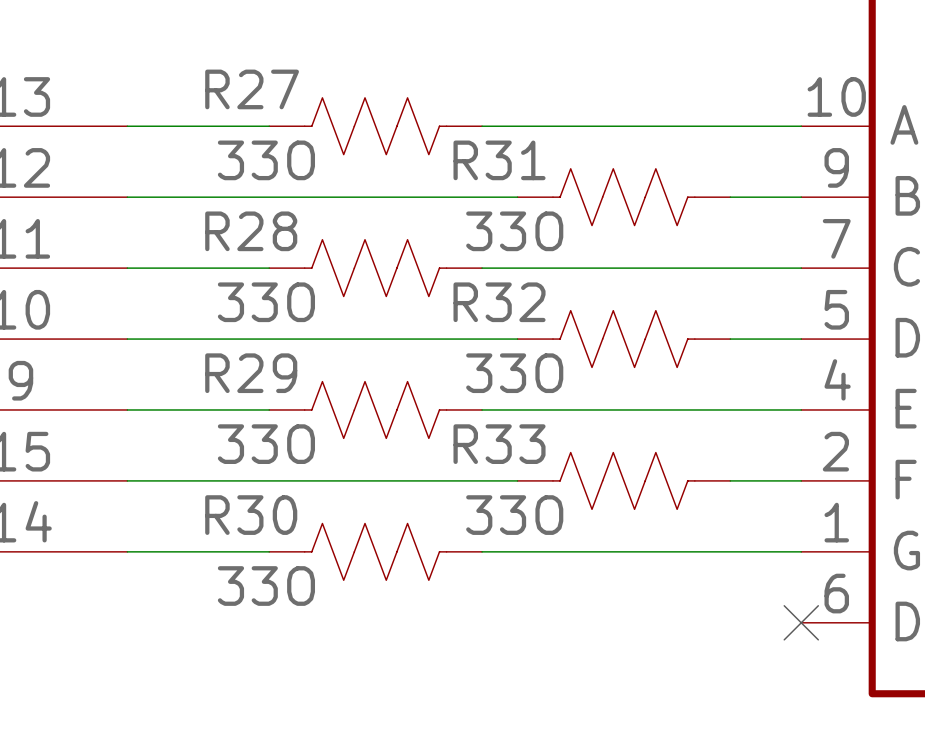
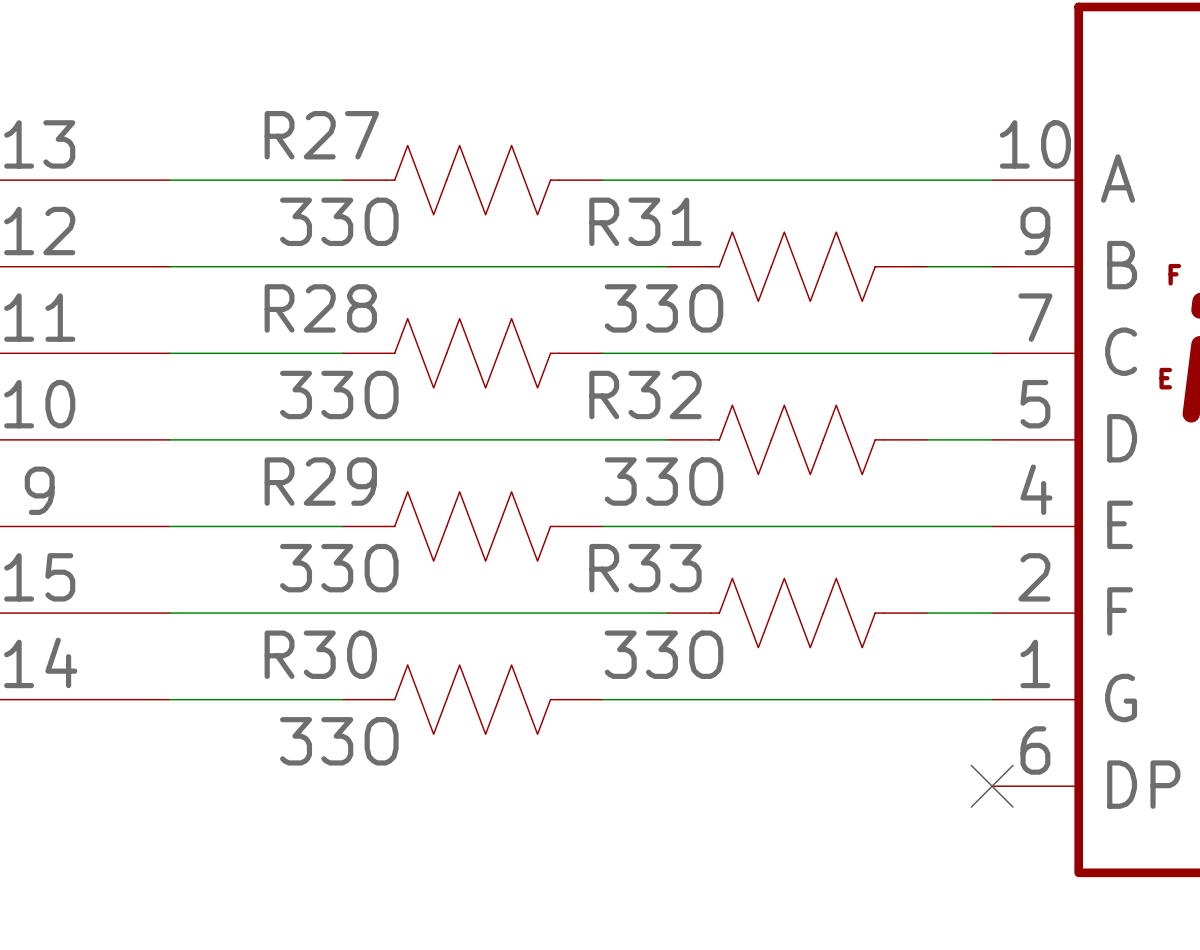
R31 position: (623, 197) -> (797, 266)
R32 position: (623, 339) -> (797, 439)
R33 position: (623, 480) -> (797, 613)

